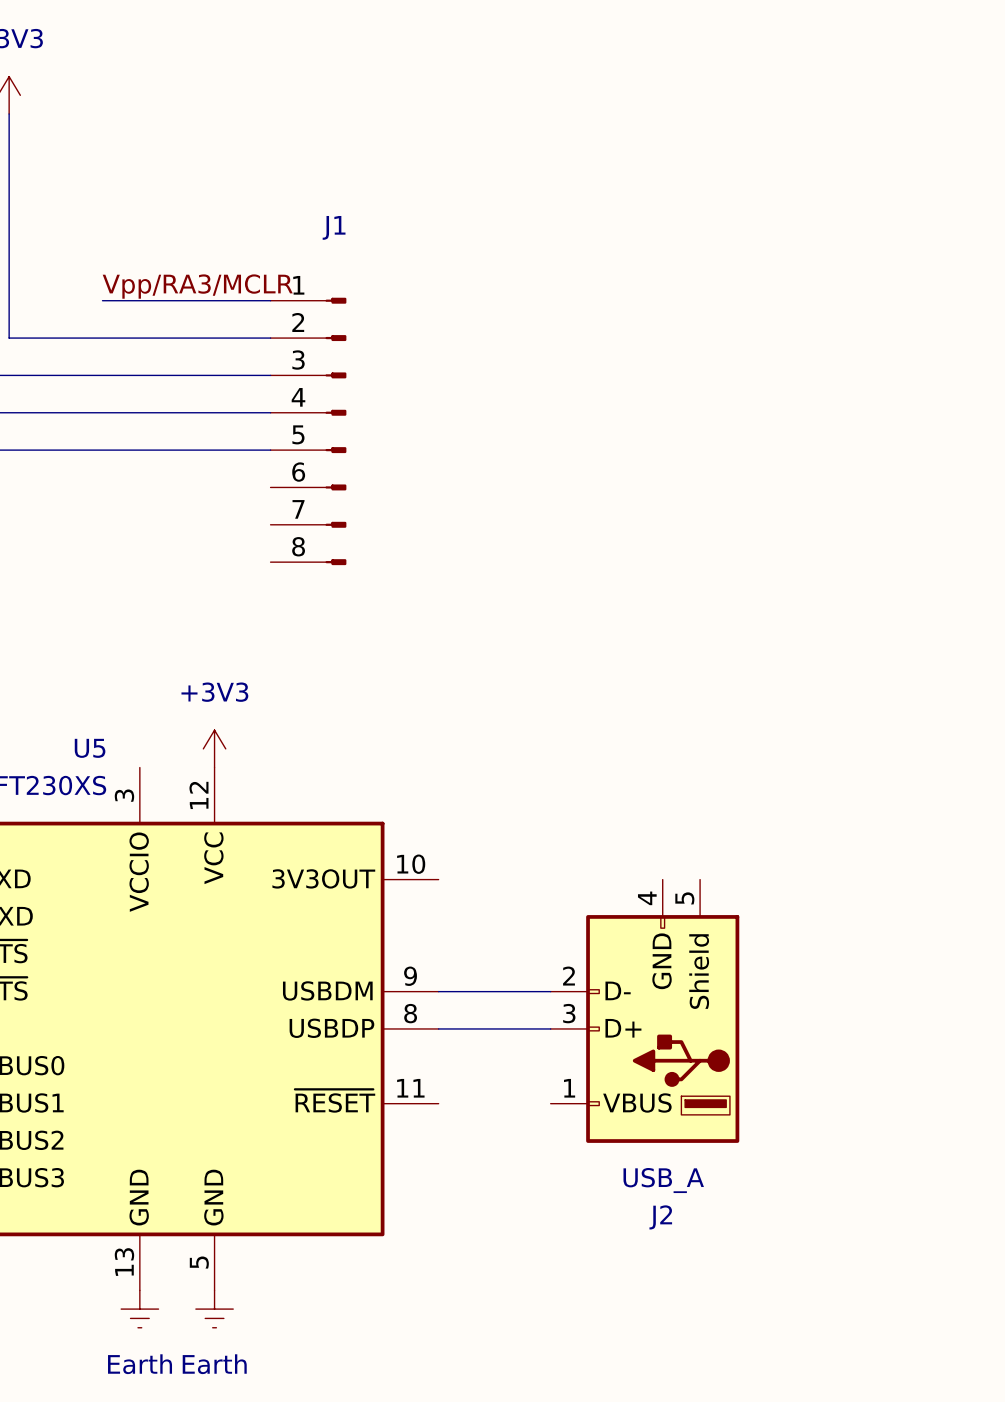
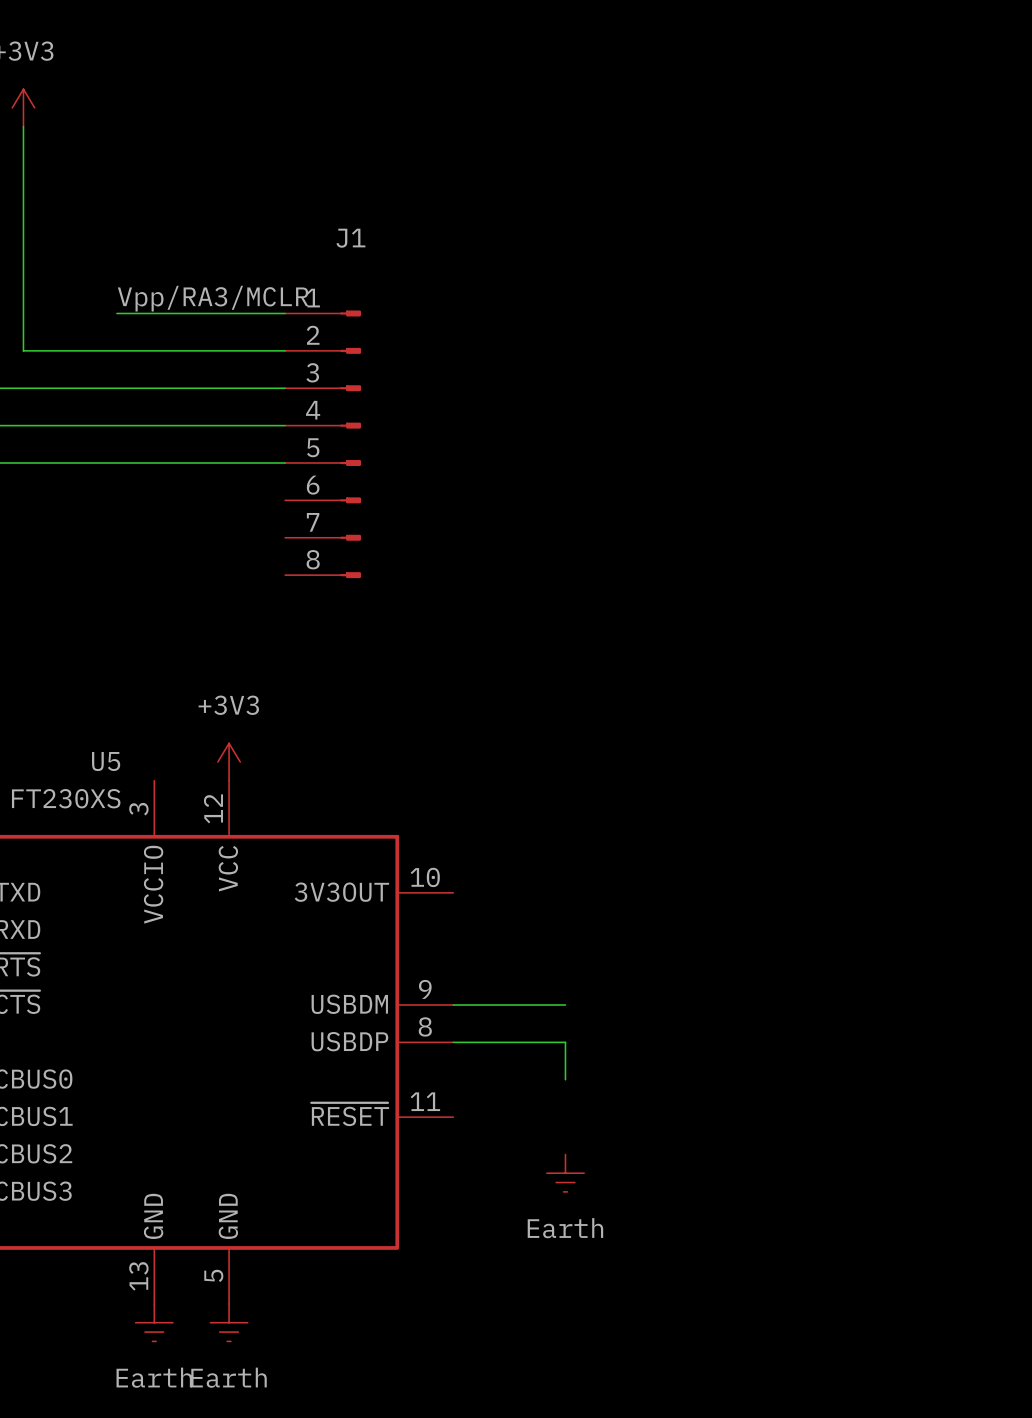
J2: USB_A (644, 1011) -> none
wire: none -> (565, 1042) (565, 1079)
power symbol: none -> Earth (565, 1173)

